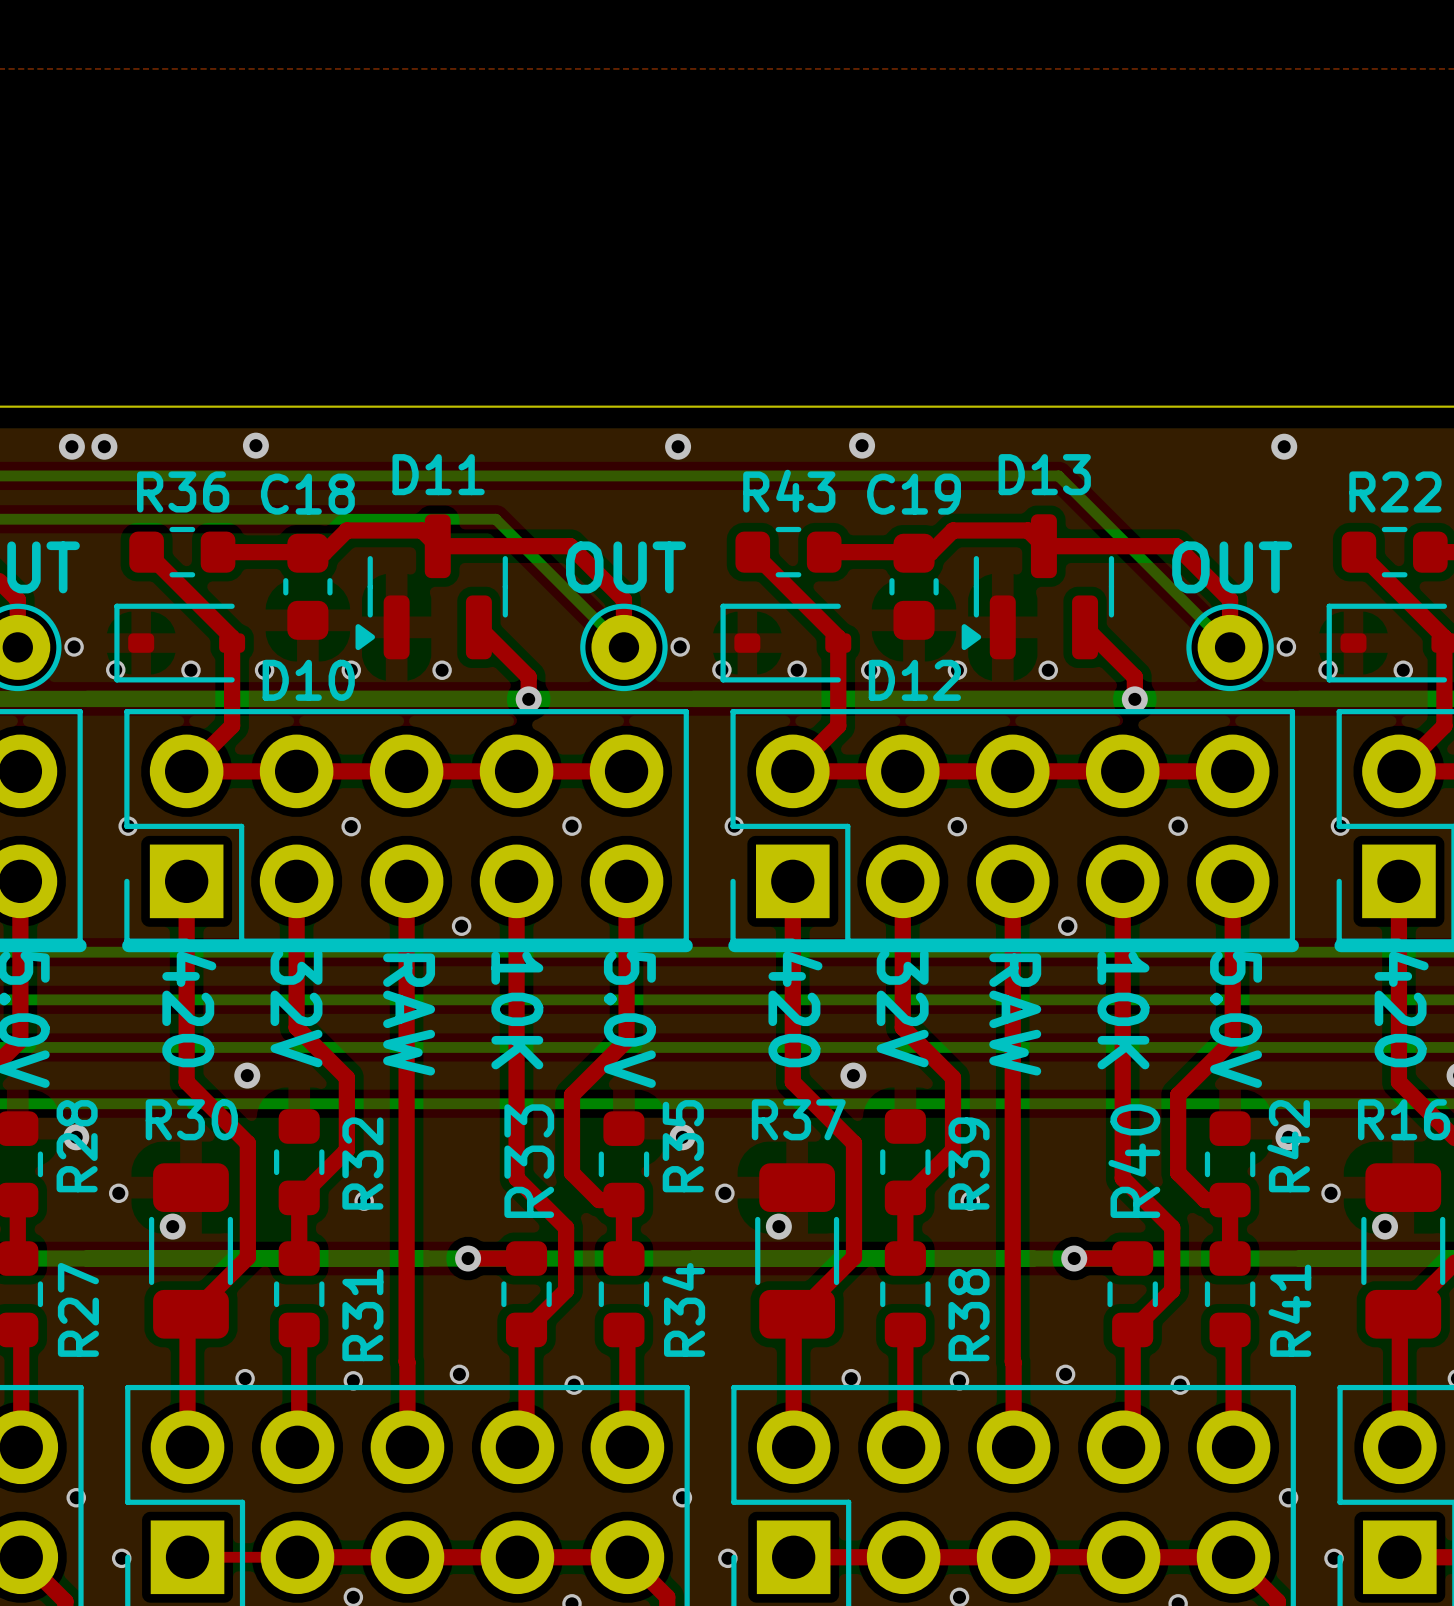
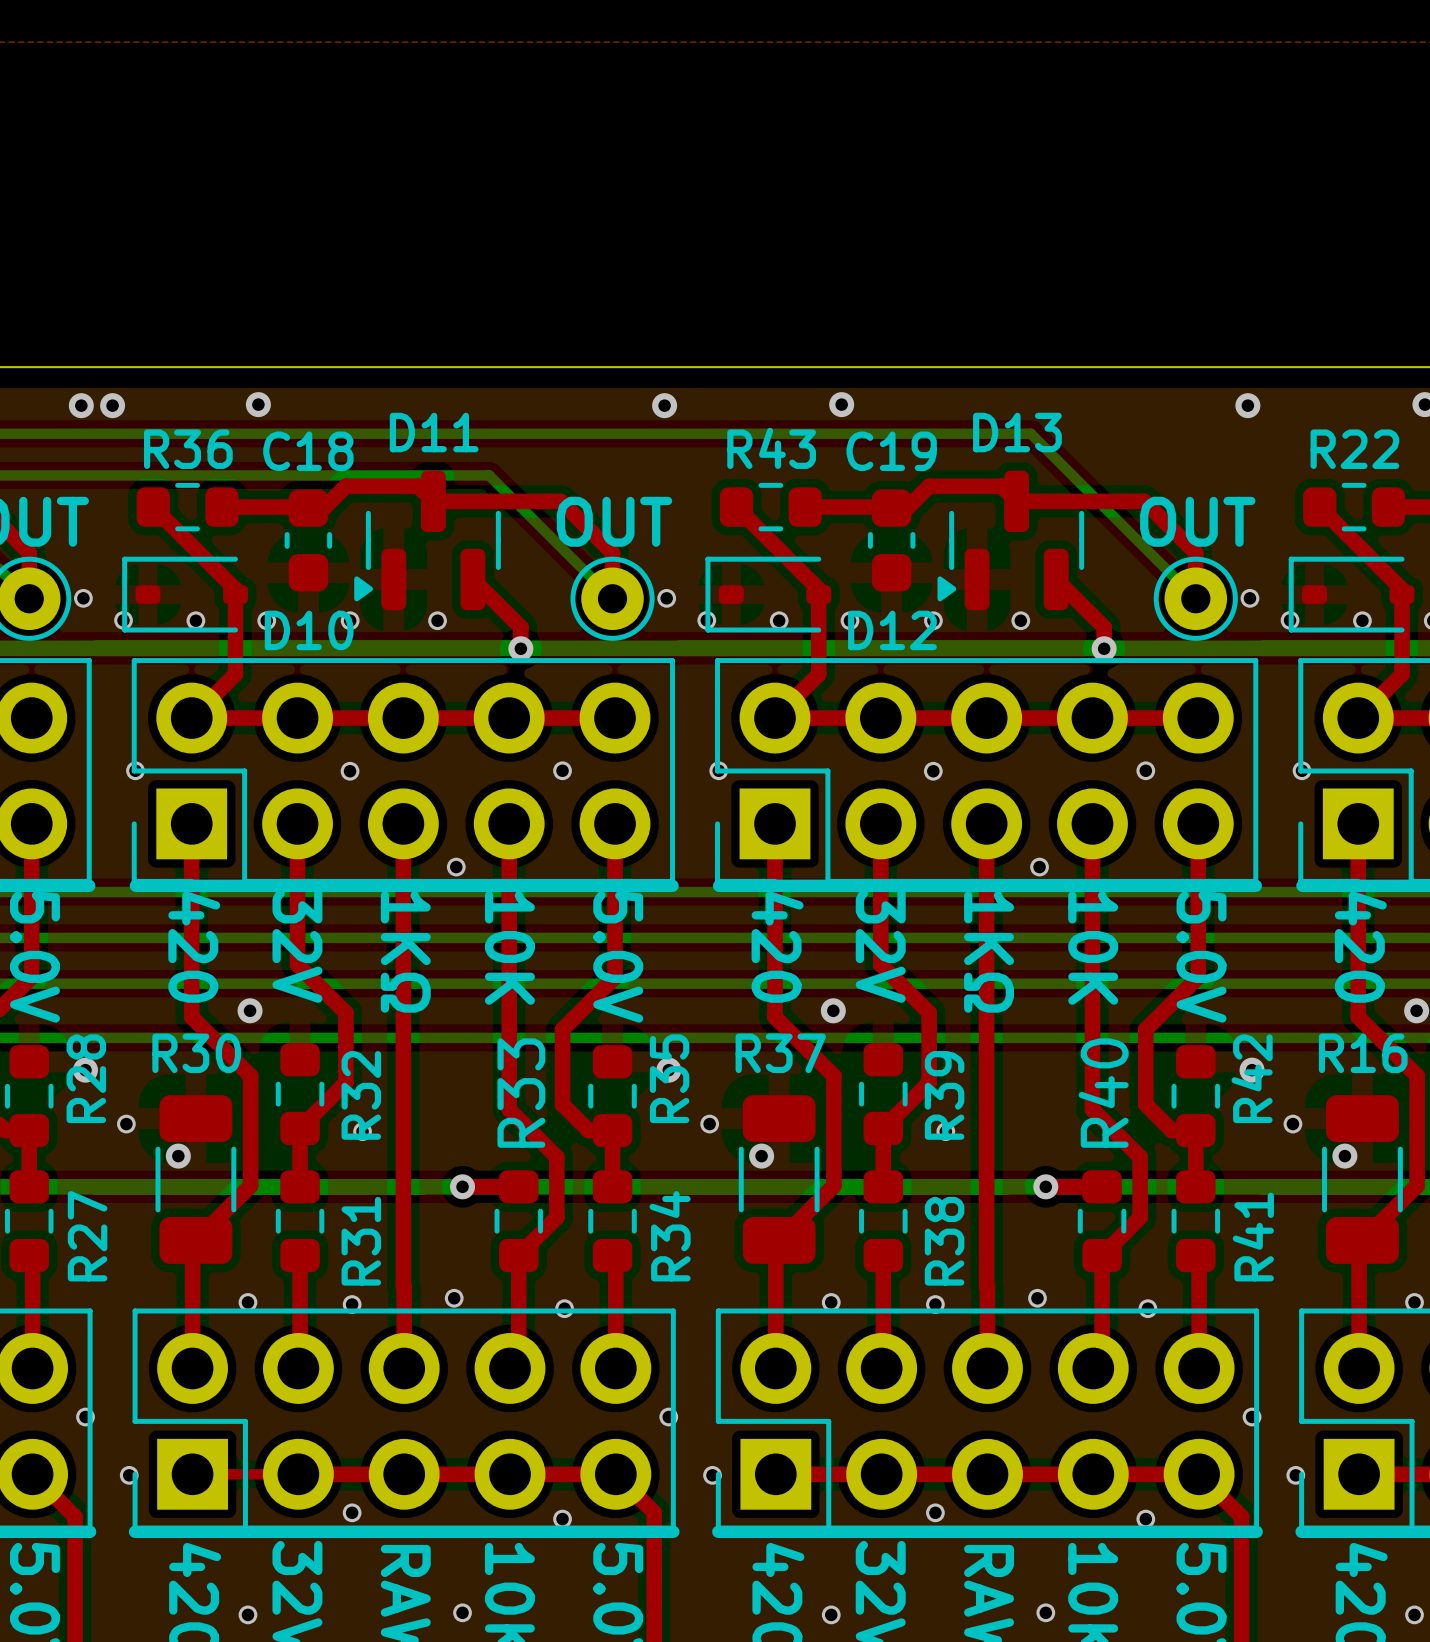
text: RAW (409, 1014) -> 1KΩ (405, 952)
text: RAW (1015, 1014) -> 1KΩ (989, 952)

